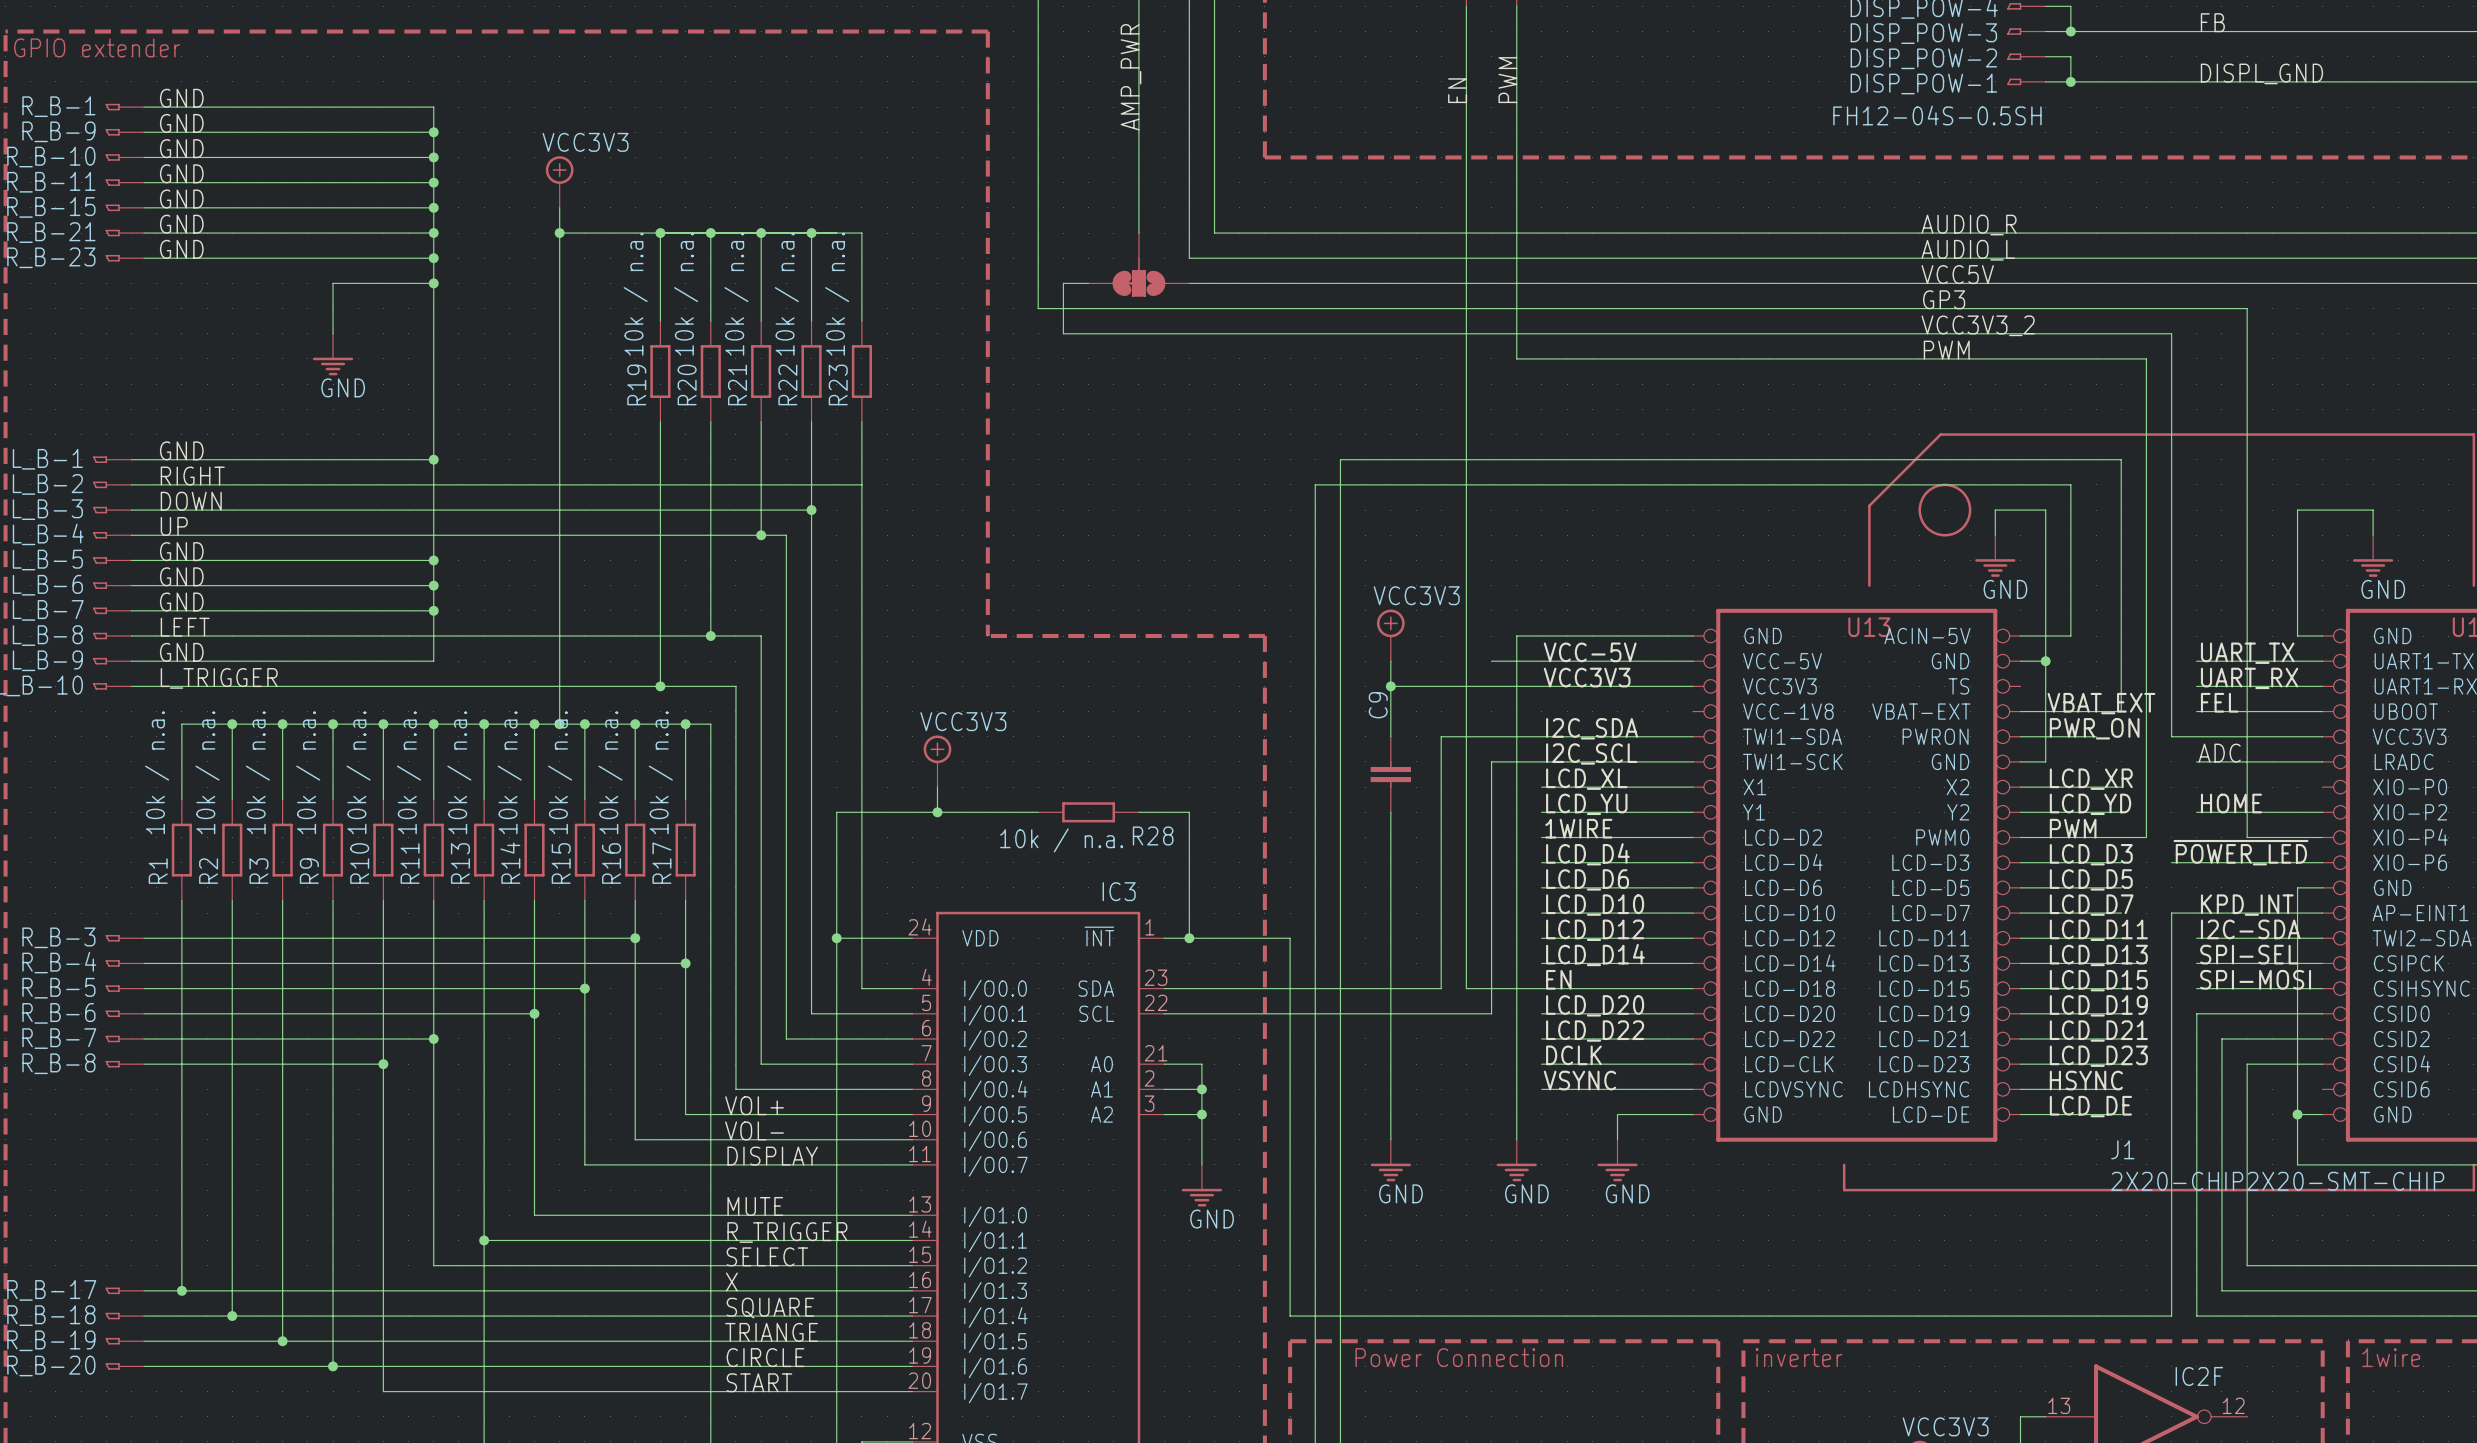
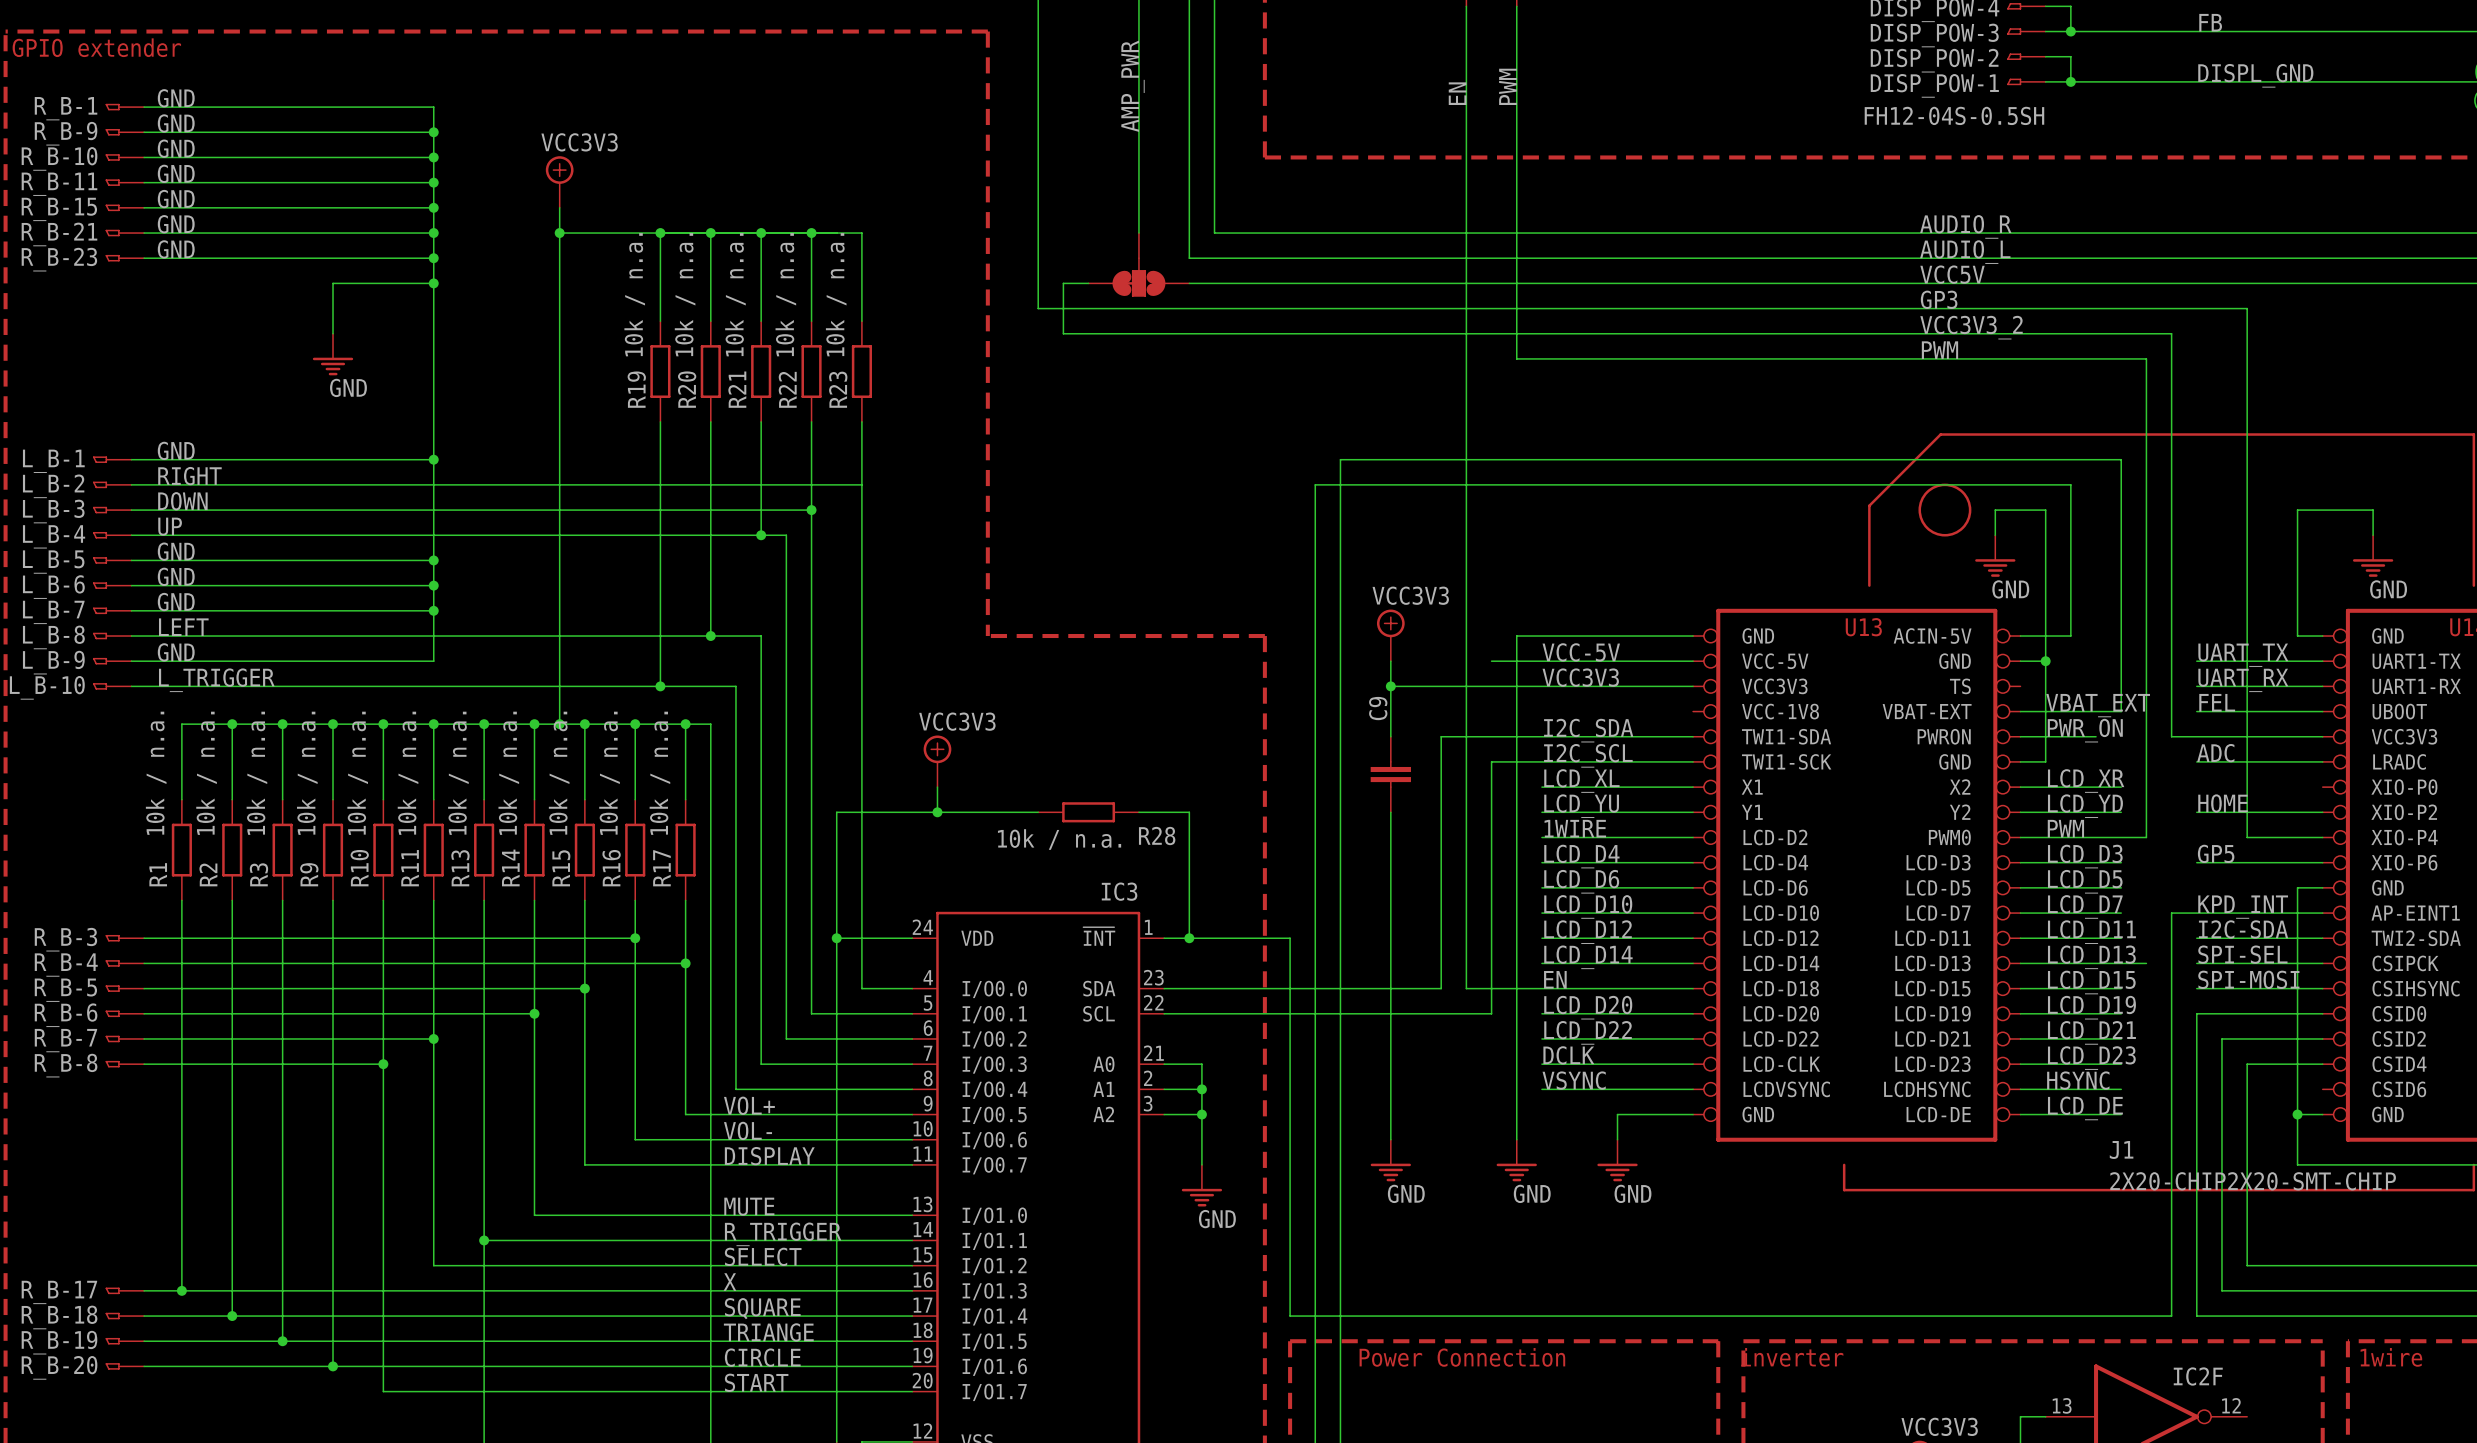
label: ~{POWER_LED} (2241, 852) -> none
label: none -> GP5 (2216, 853)
wire: (2171, 862) (2196, 862) -> none

